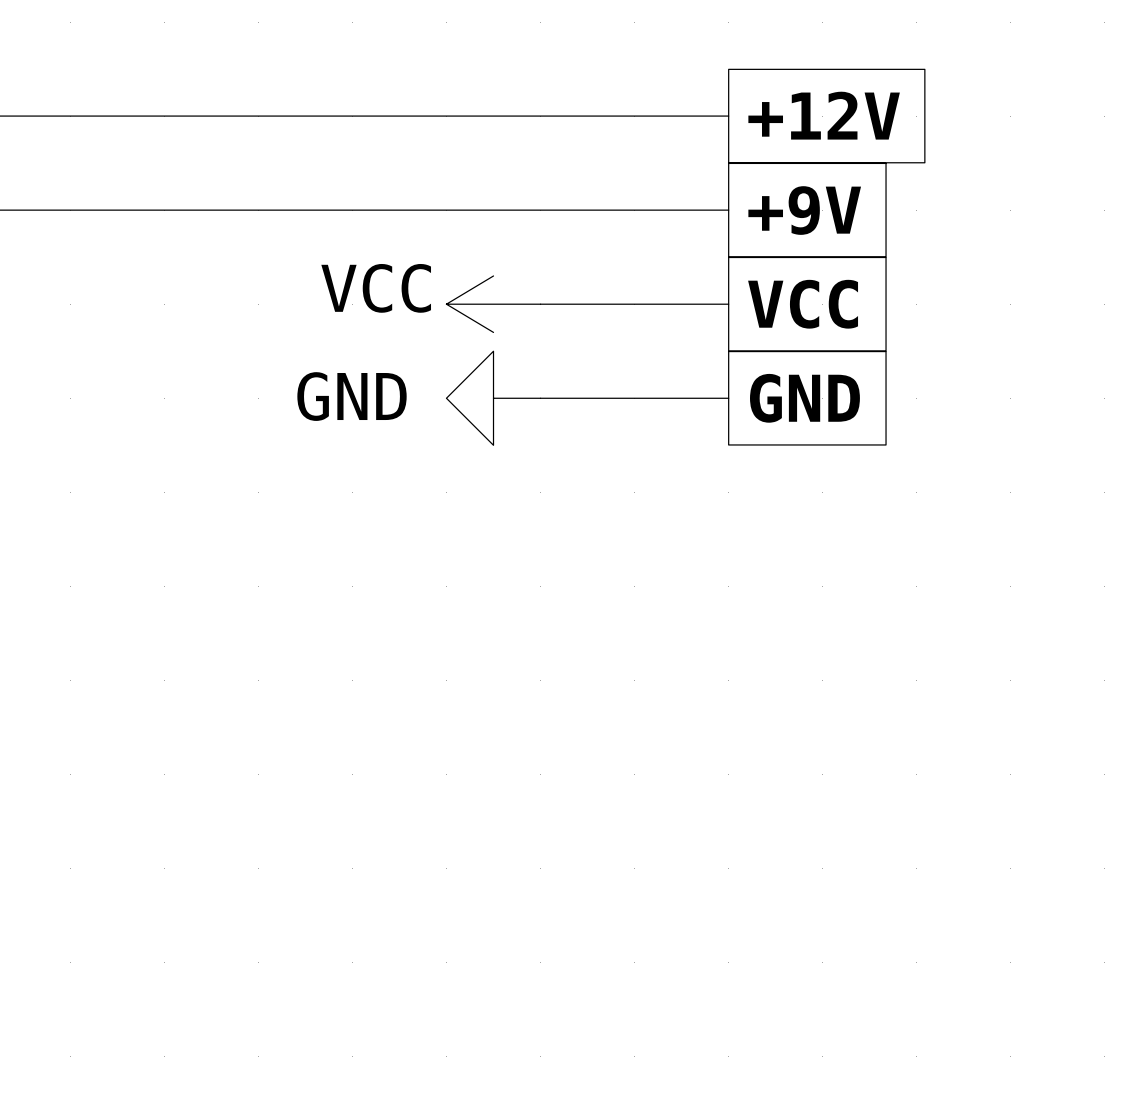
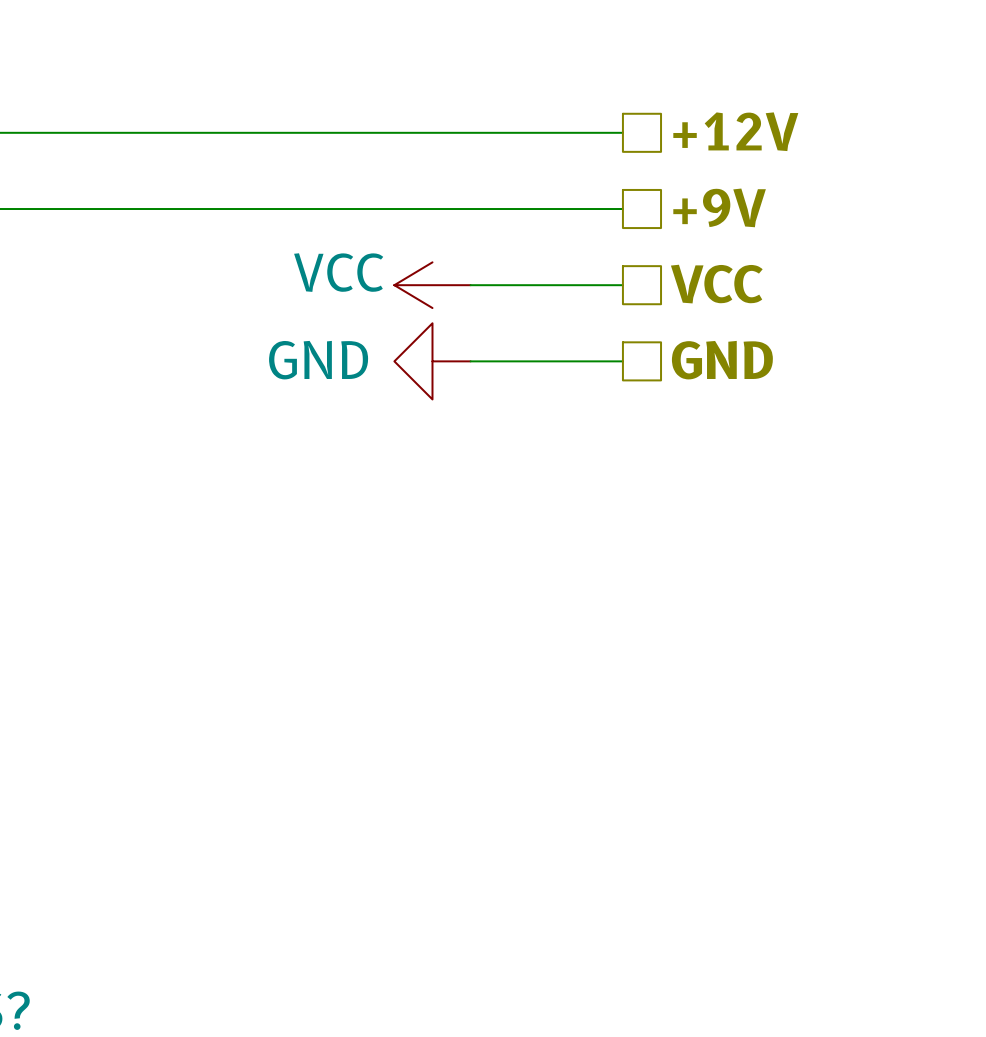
hierarchical label: none -> +12V (735, 131)
global label: +12V (824, 115) -> none
hierarchical label: none -> +9V (719, 207)
global label: +9V (804, 210) -> none
hierarchical label: none -> VCC (716, 284)
global label: VCC (803, 304) -> none
hierarchical label: none -> GND (722, 360)
global label: GND (804, 398) -> none

